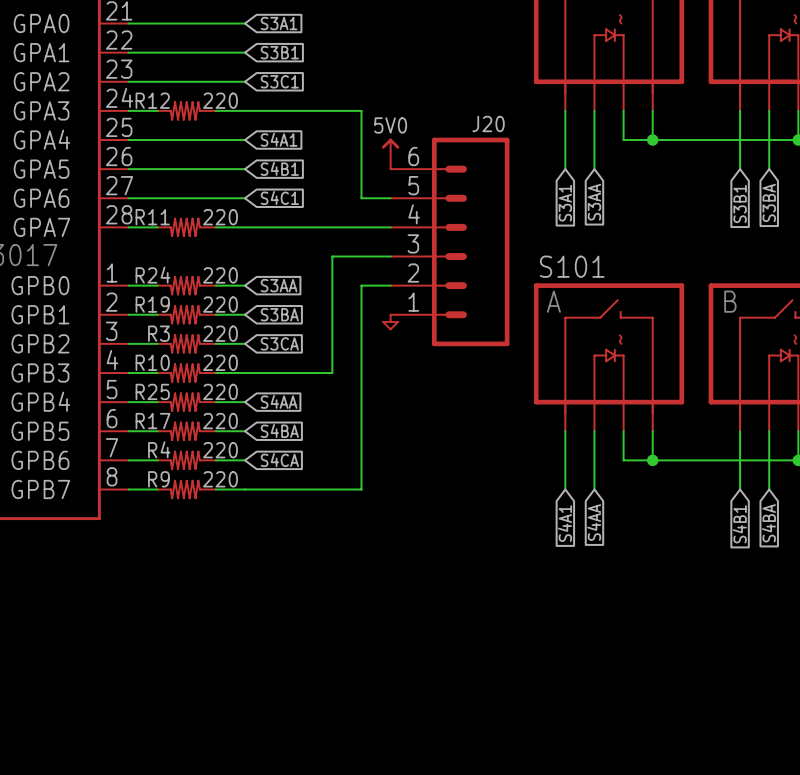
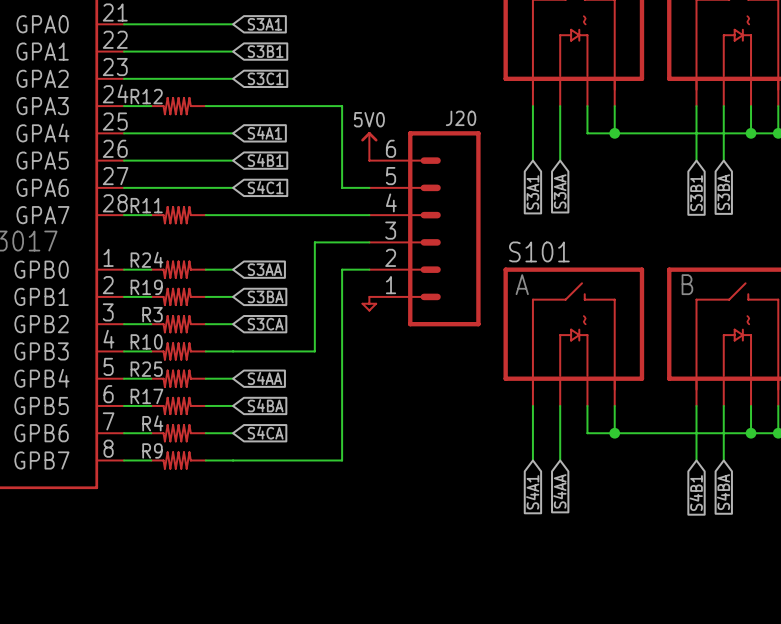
R12 value: 220 (220, 100) -> none
R11 value: 220 (220, 217) -> none
R24 value: 220 (220, 275) -> none
R19 value: 220 (220, 304) -> none
R3 value: 220 (220, 333) -> none
R10 value: 220 (220, 362) -> none
R25 value: 220 (220, 391) -> none
R17 value: 220 (220, 421) -> none
R4 value: 220 (220, 450) -> none
R9 value: 220 (220, 479) -> none

